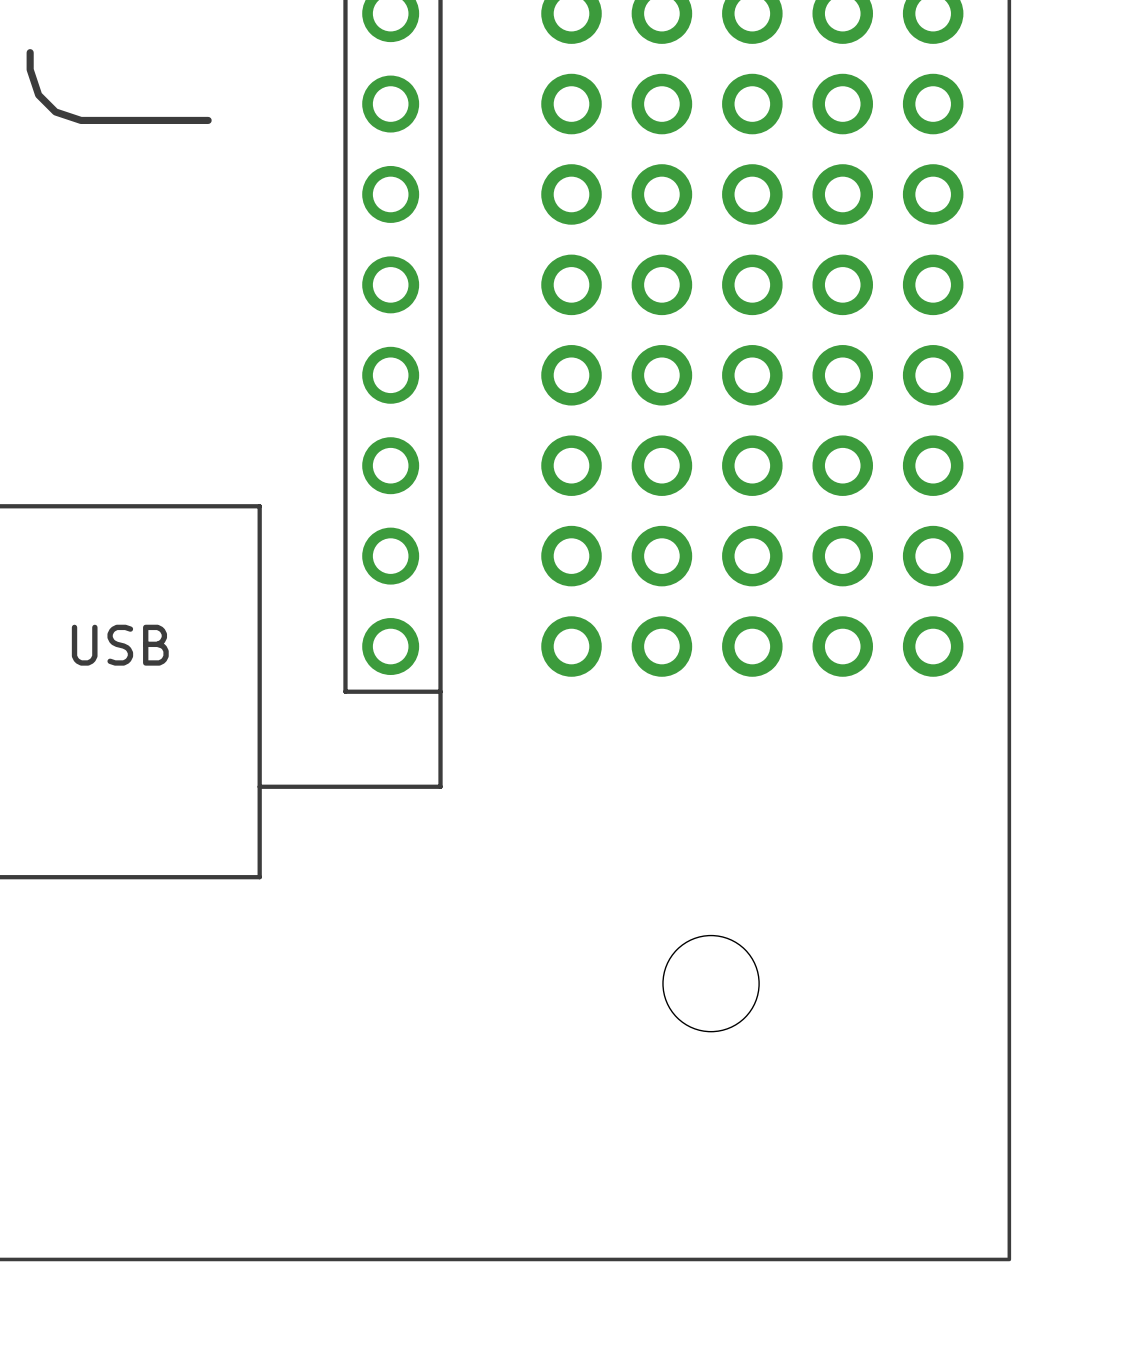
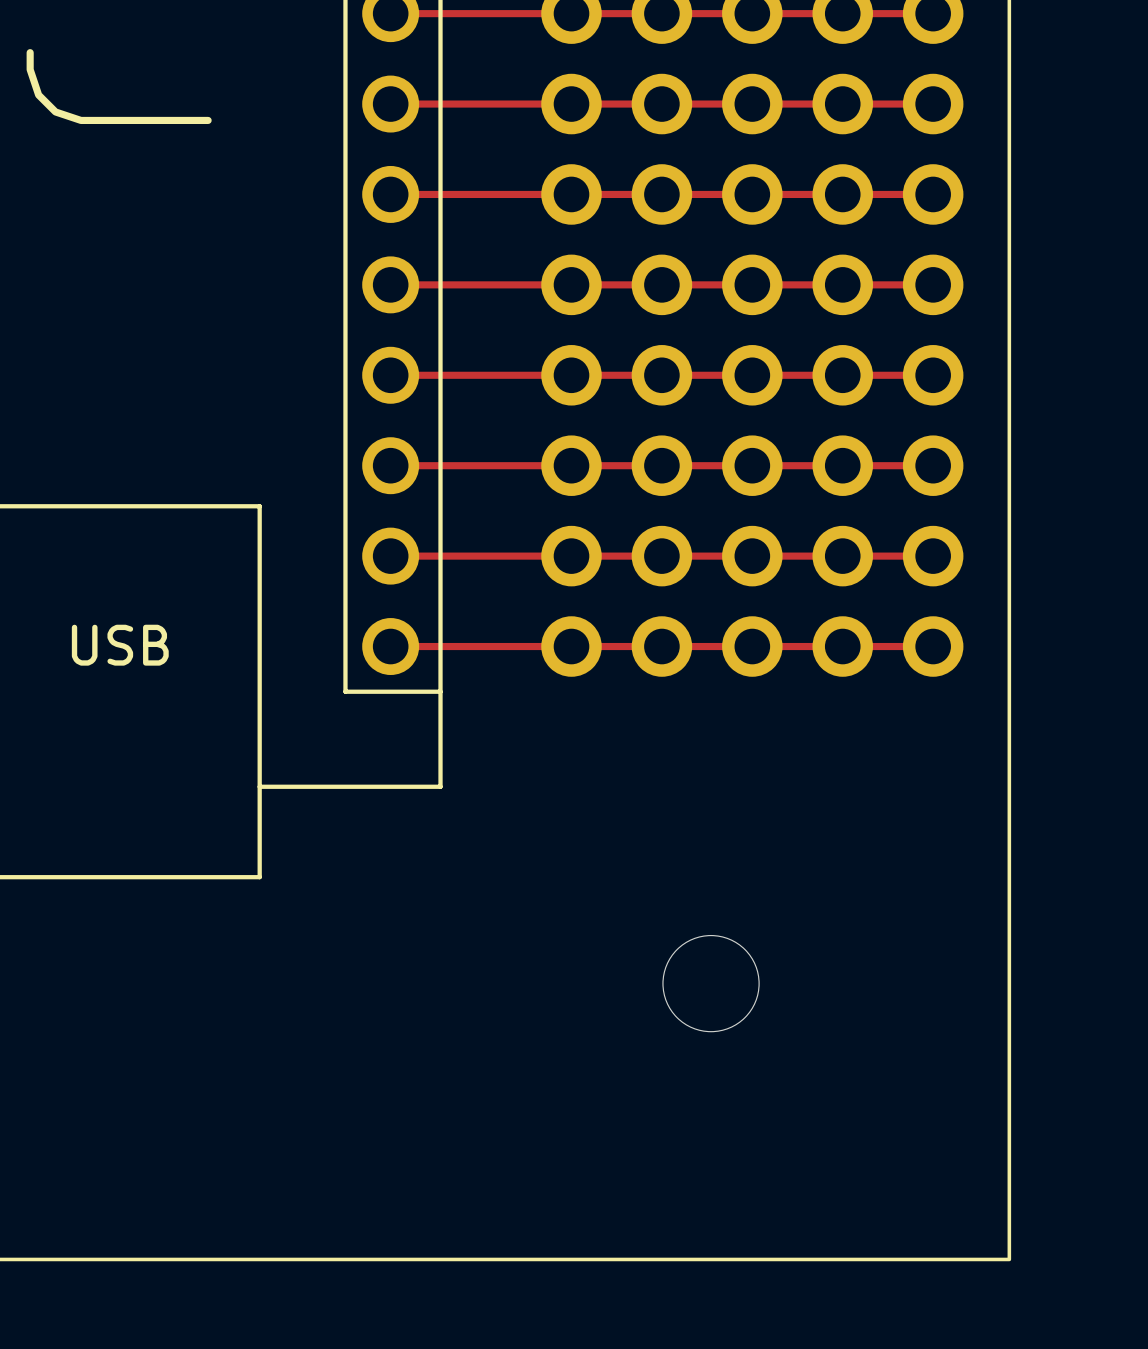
track: none -> (390, 13) (933, 13)
track: none -> (390, 104) (933, 104)
track: none -> (390, 194) (933, 194)
track: none -> (390, 284) (933, 284)
track: none -> (390, 375) (933, 375)
track: none -> (390, 465) (933, 465)
track: none -> (390, 556) (933, 556)
track: none -> (390, 646) (933, 646)

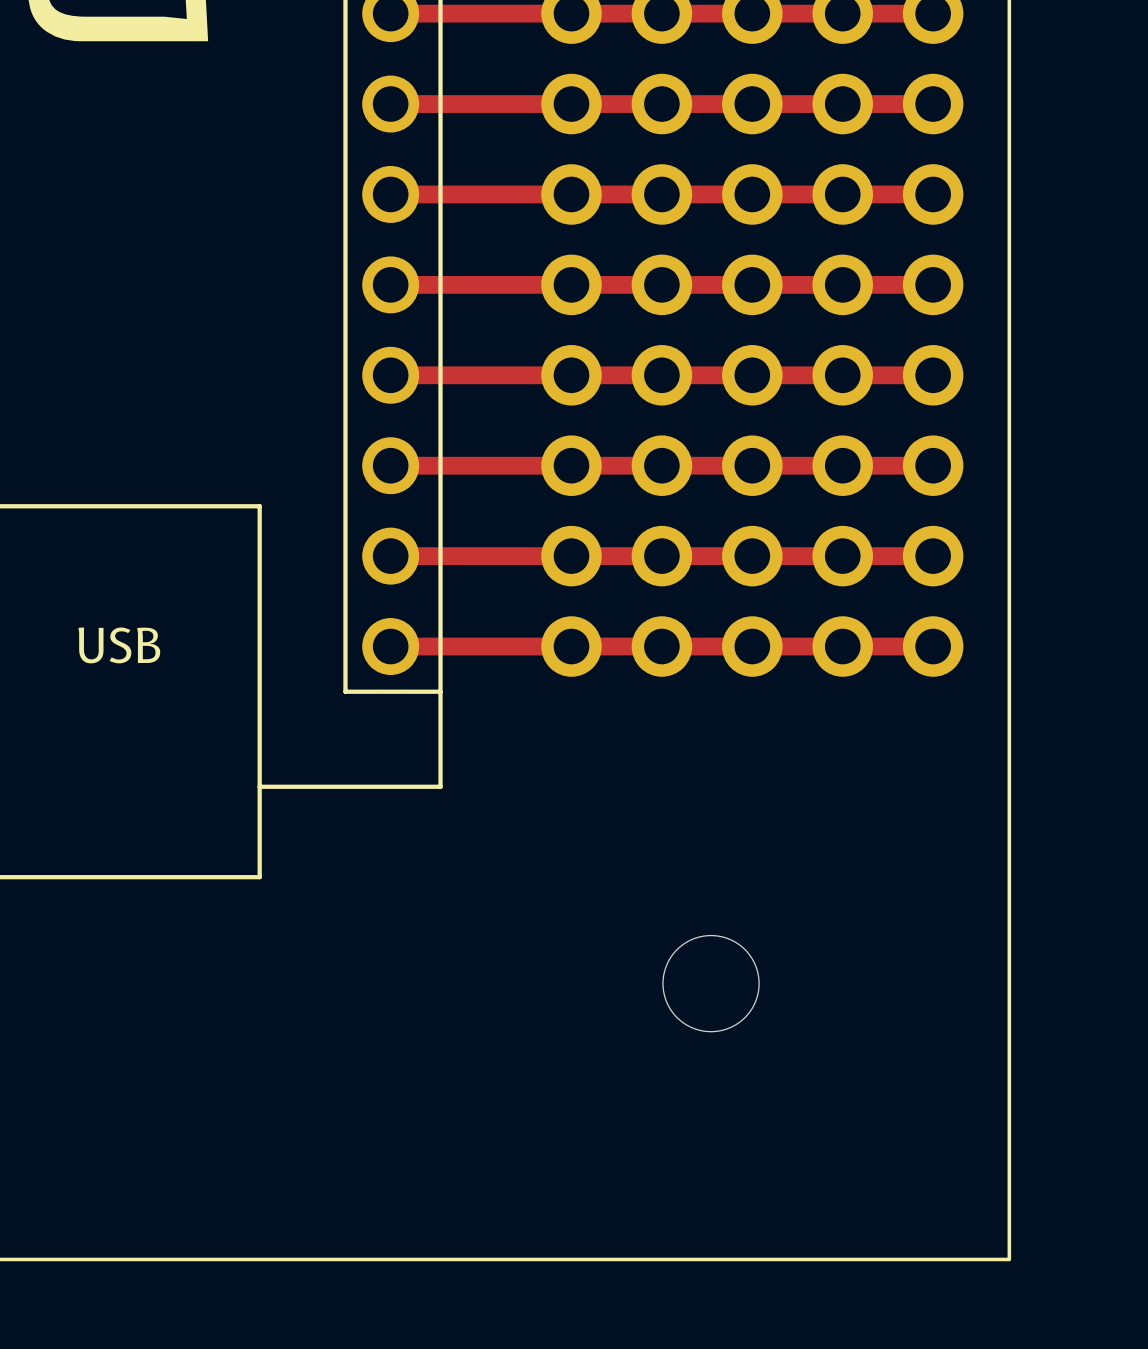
track width: thin (390, 13) (933, 13) -> thick (390, 13) (933, 13)
track width: thin (390, 104) (933, 104) -> thick (390, 104) (933, 104)
track width: thin (390, 194) (933, 194) -> thick (390, 194) (933, 194)
track width: thin (390, 284) (933, 284) -> thick (390, 284) (933, 284)
track width: thin (390, 375) (933, 375) -> thick (390, 375) (933, 375)
track width: thin (390, 465) (933, 465) -> thick (390, 465) (933, 465)
track width: thin (390, 556) (933, 556) -> thick (390, 556) (933, 556)
track width: thin (390, 646) (933, 646) -> thick (390, 646) (933, 646)

